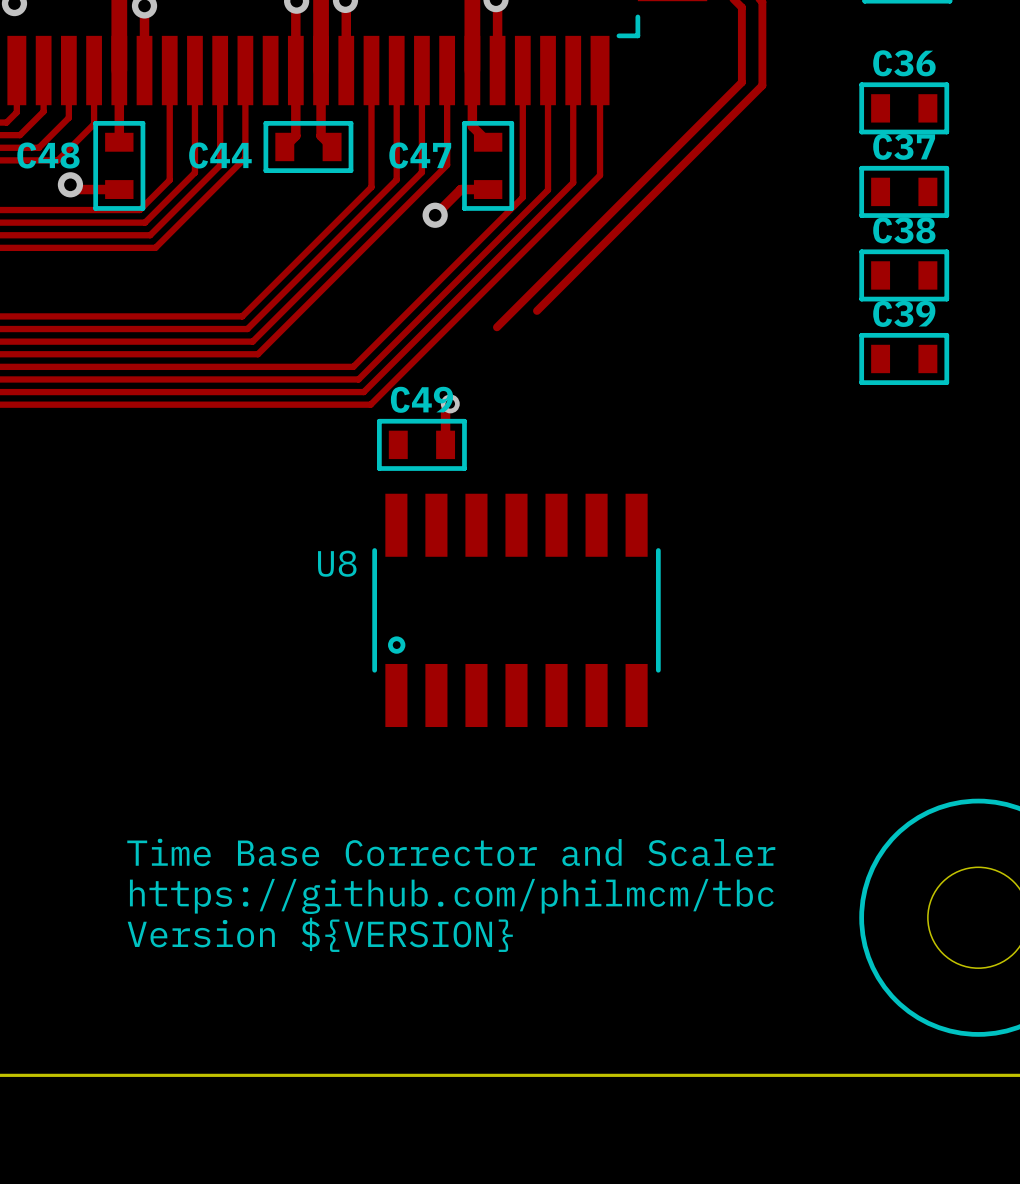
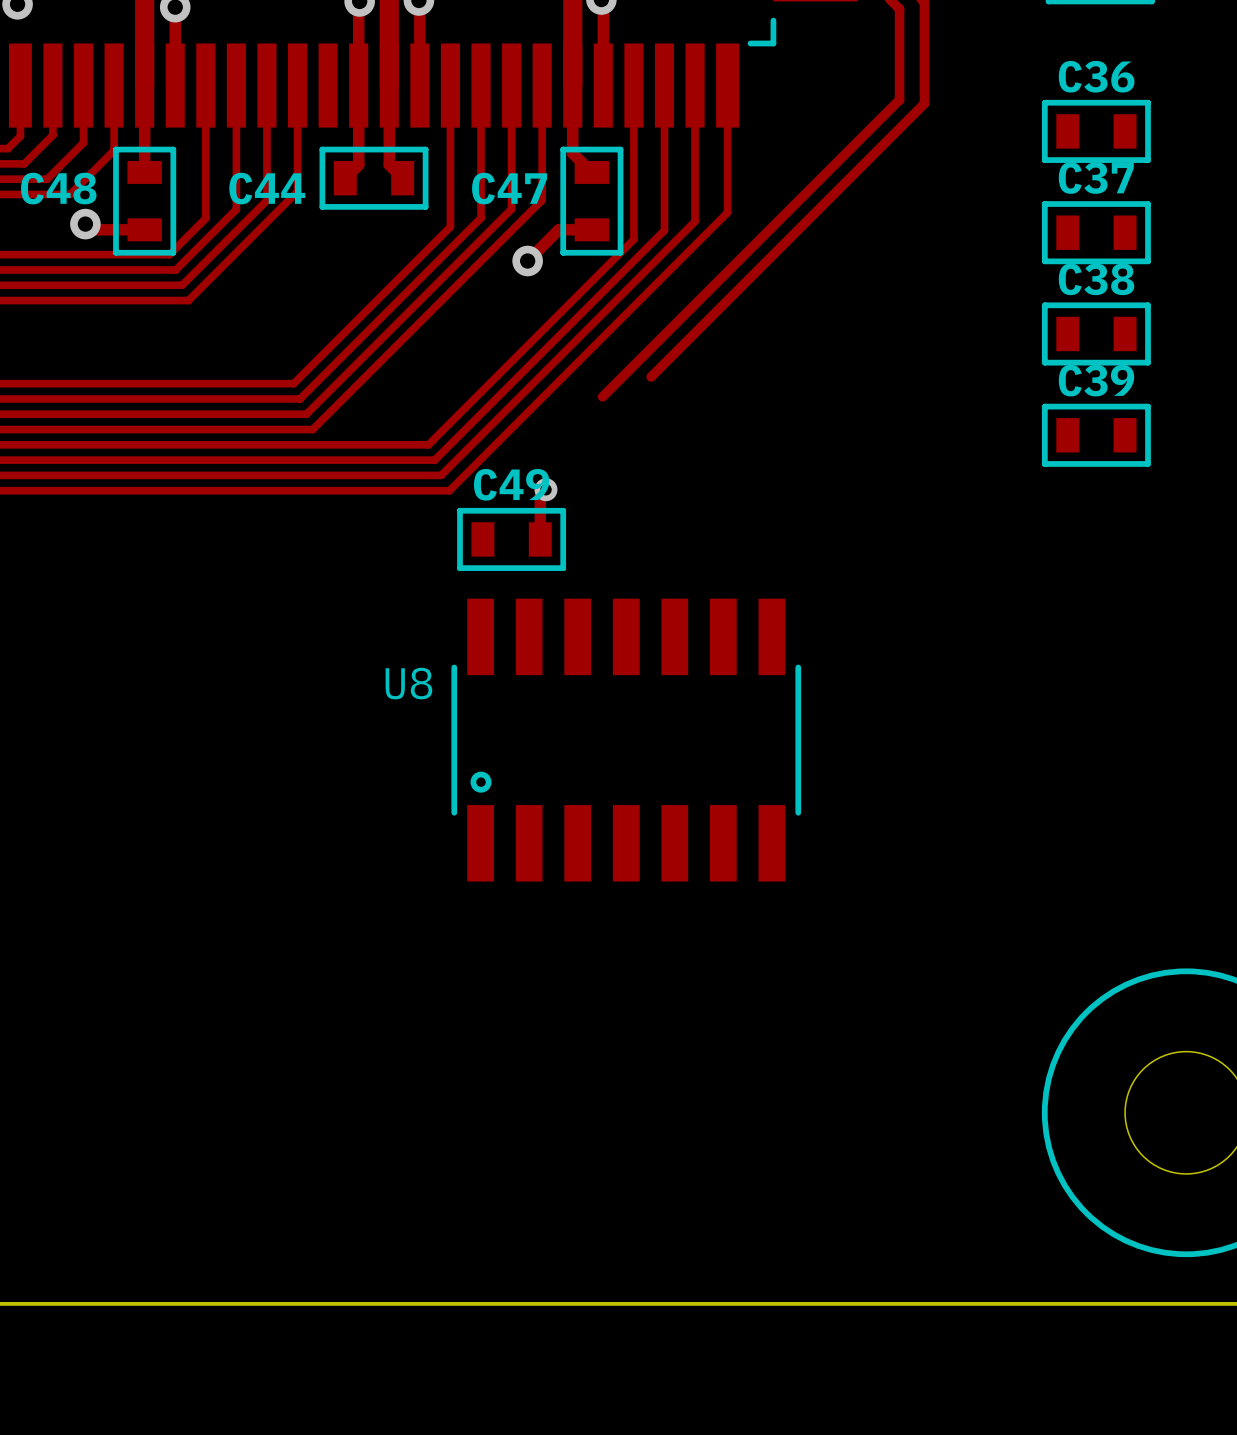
text: Time Base Corrector and Scaler (451, 852) -> none
text: https://github.com/philmcm/tbc (451, 896) -> none
text: Version ${VERSION} (320, 934) -> none

